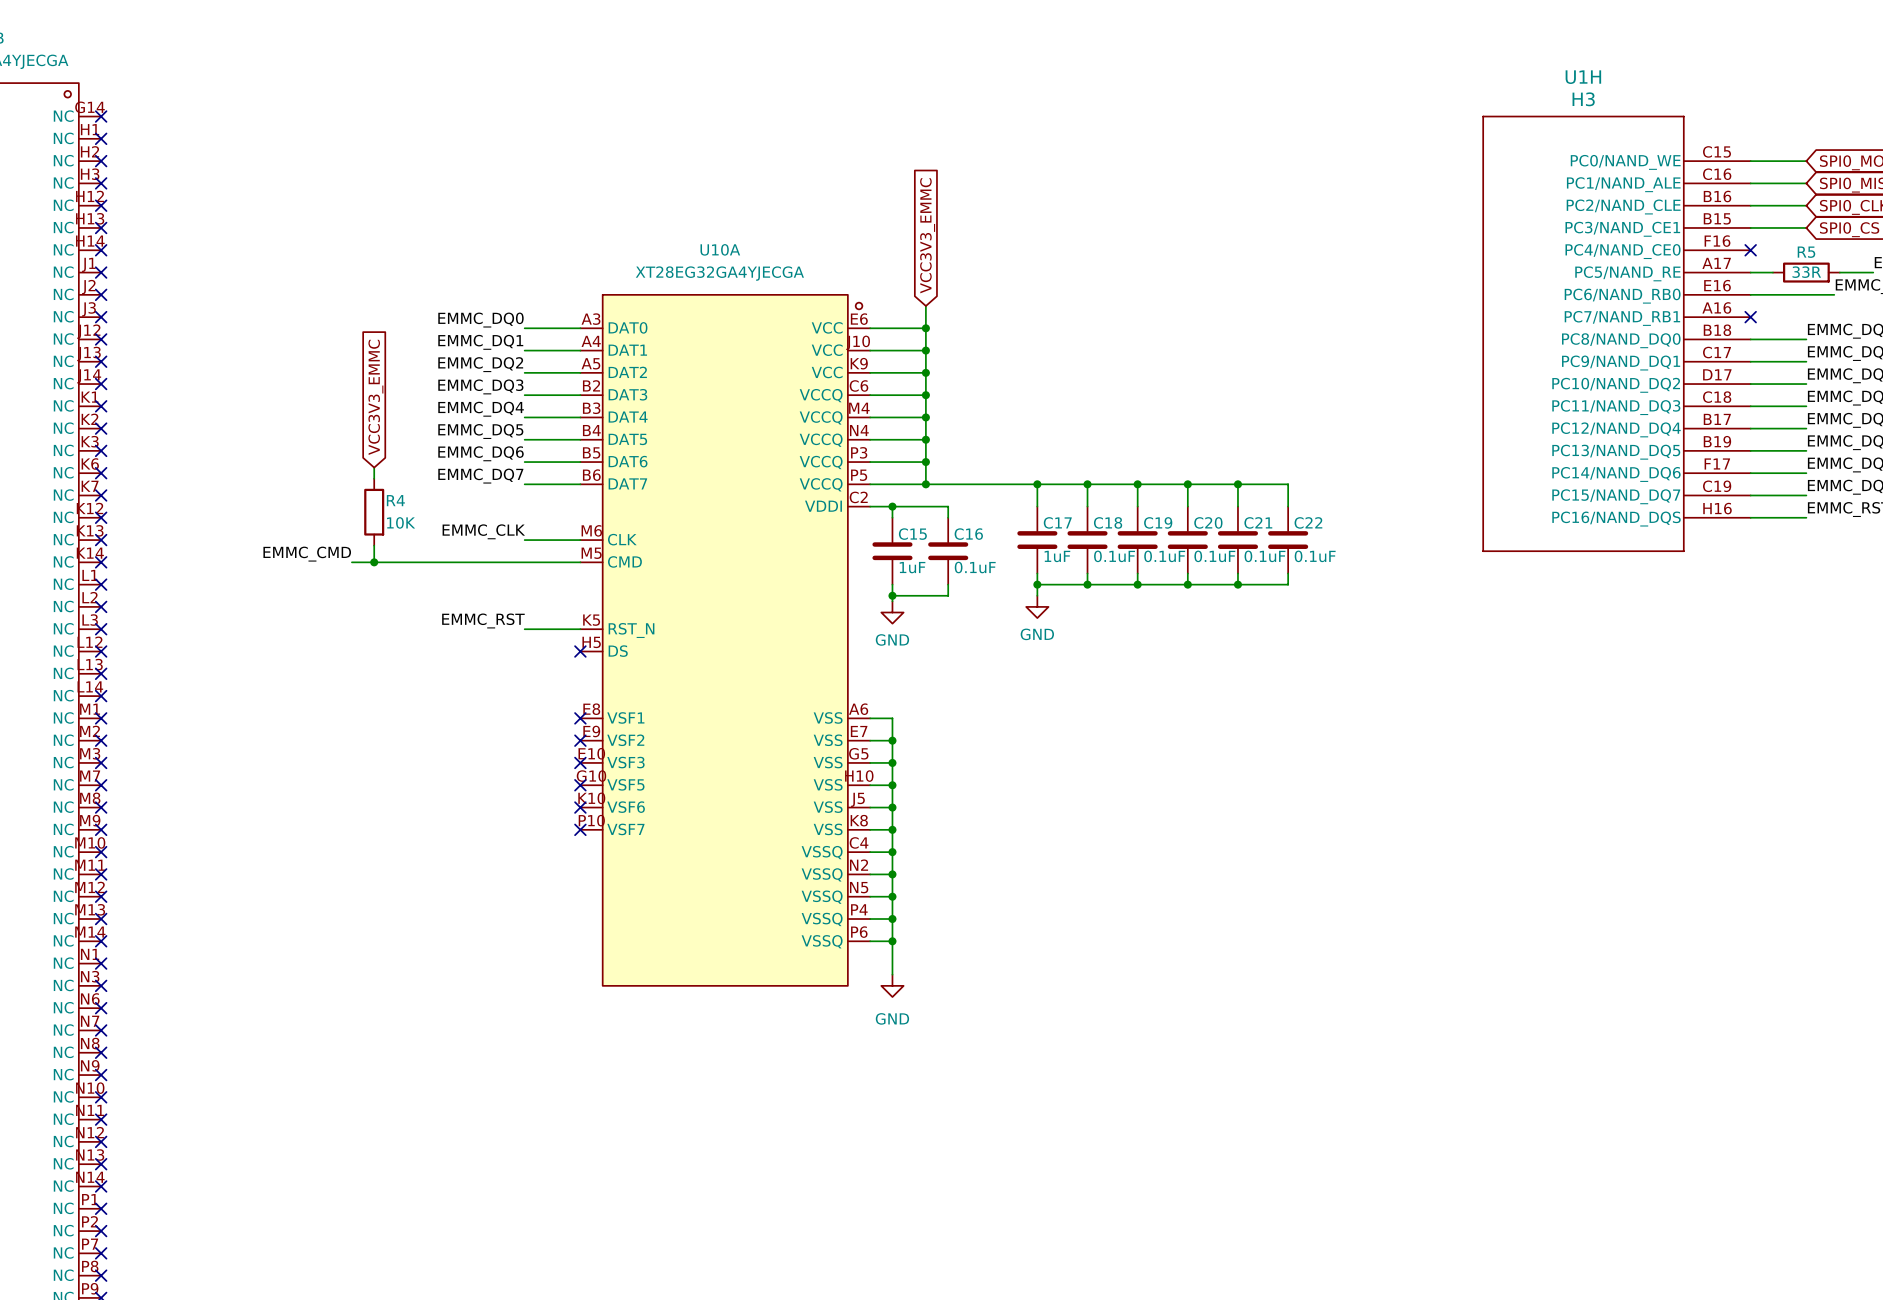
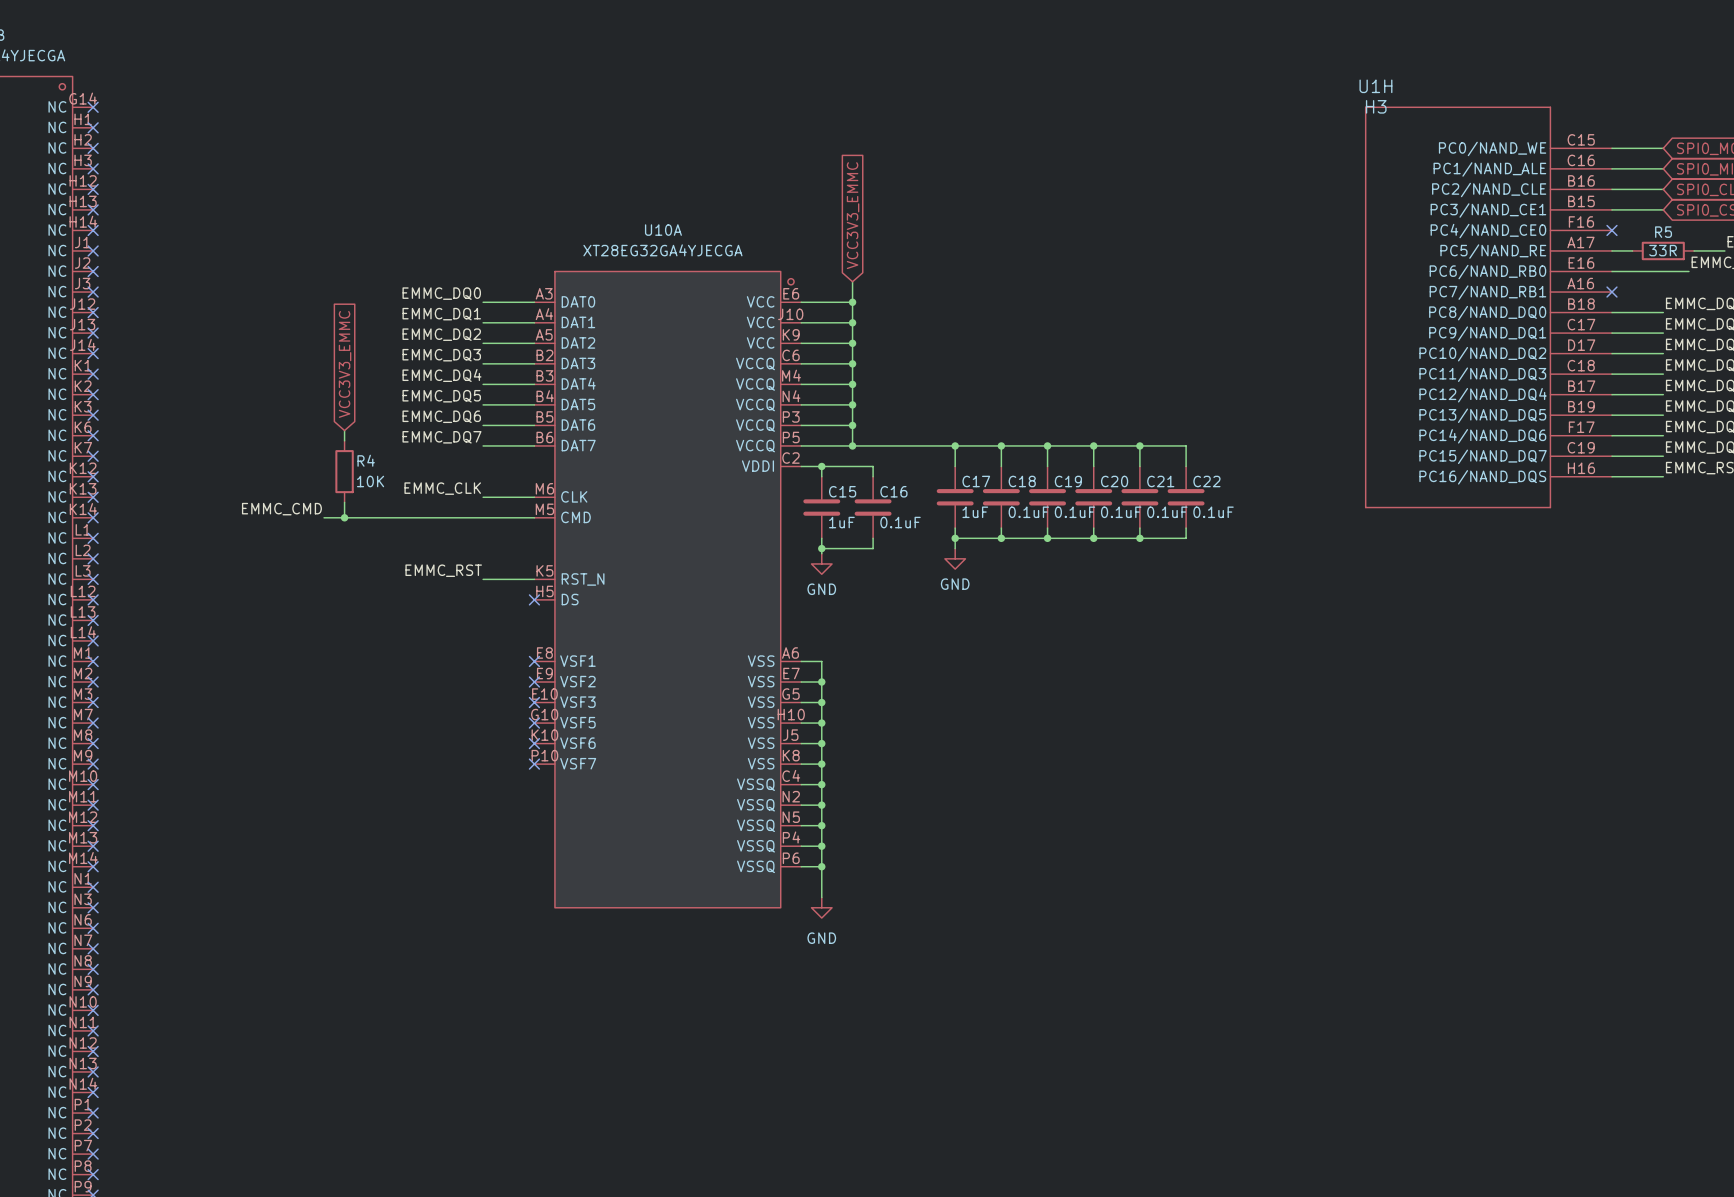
U1H name position: U1H (1583, 77) -> U1H (1375, 86)
U1H value position: H3 (1583, 99) -> H3 (1376, 106)

